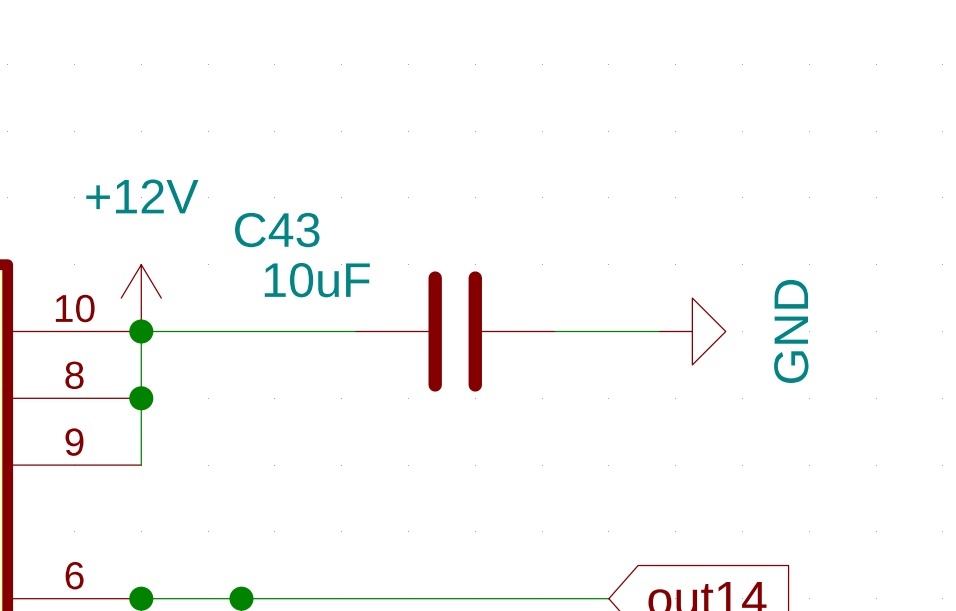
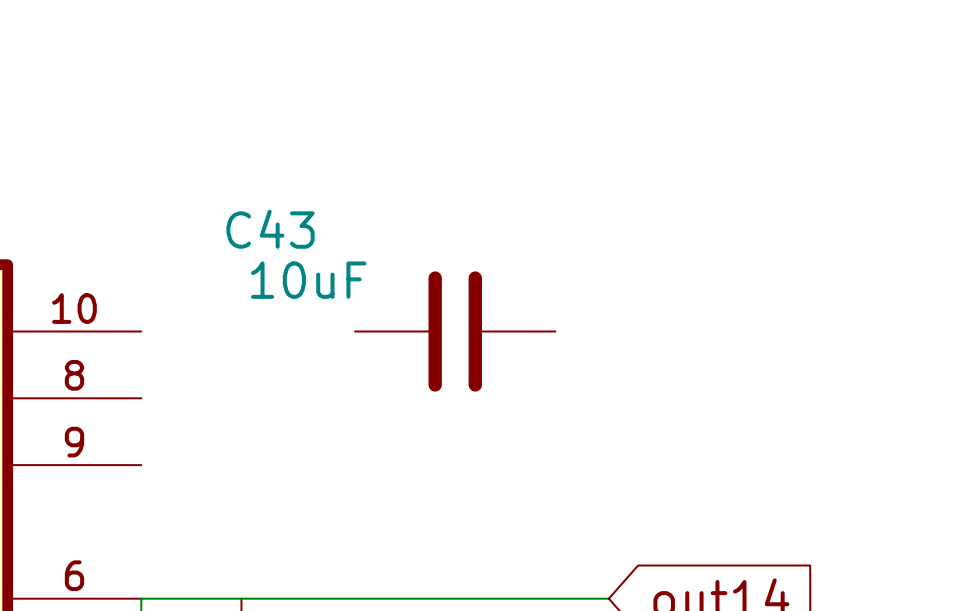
power symbol: +12V (141, 298) -> none
junction: (141, 331) -> none
wire: (355, 331) (141, 331) (141, 465) -> none
wire: (555, 331) (658, 331) -> none
power symbol: GND (692, 331) -> none
junction: (141, 398) -> none
junction: (141, 598) -> none
junction: (241, 598) -> none

